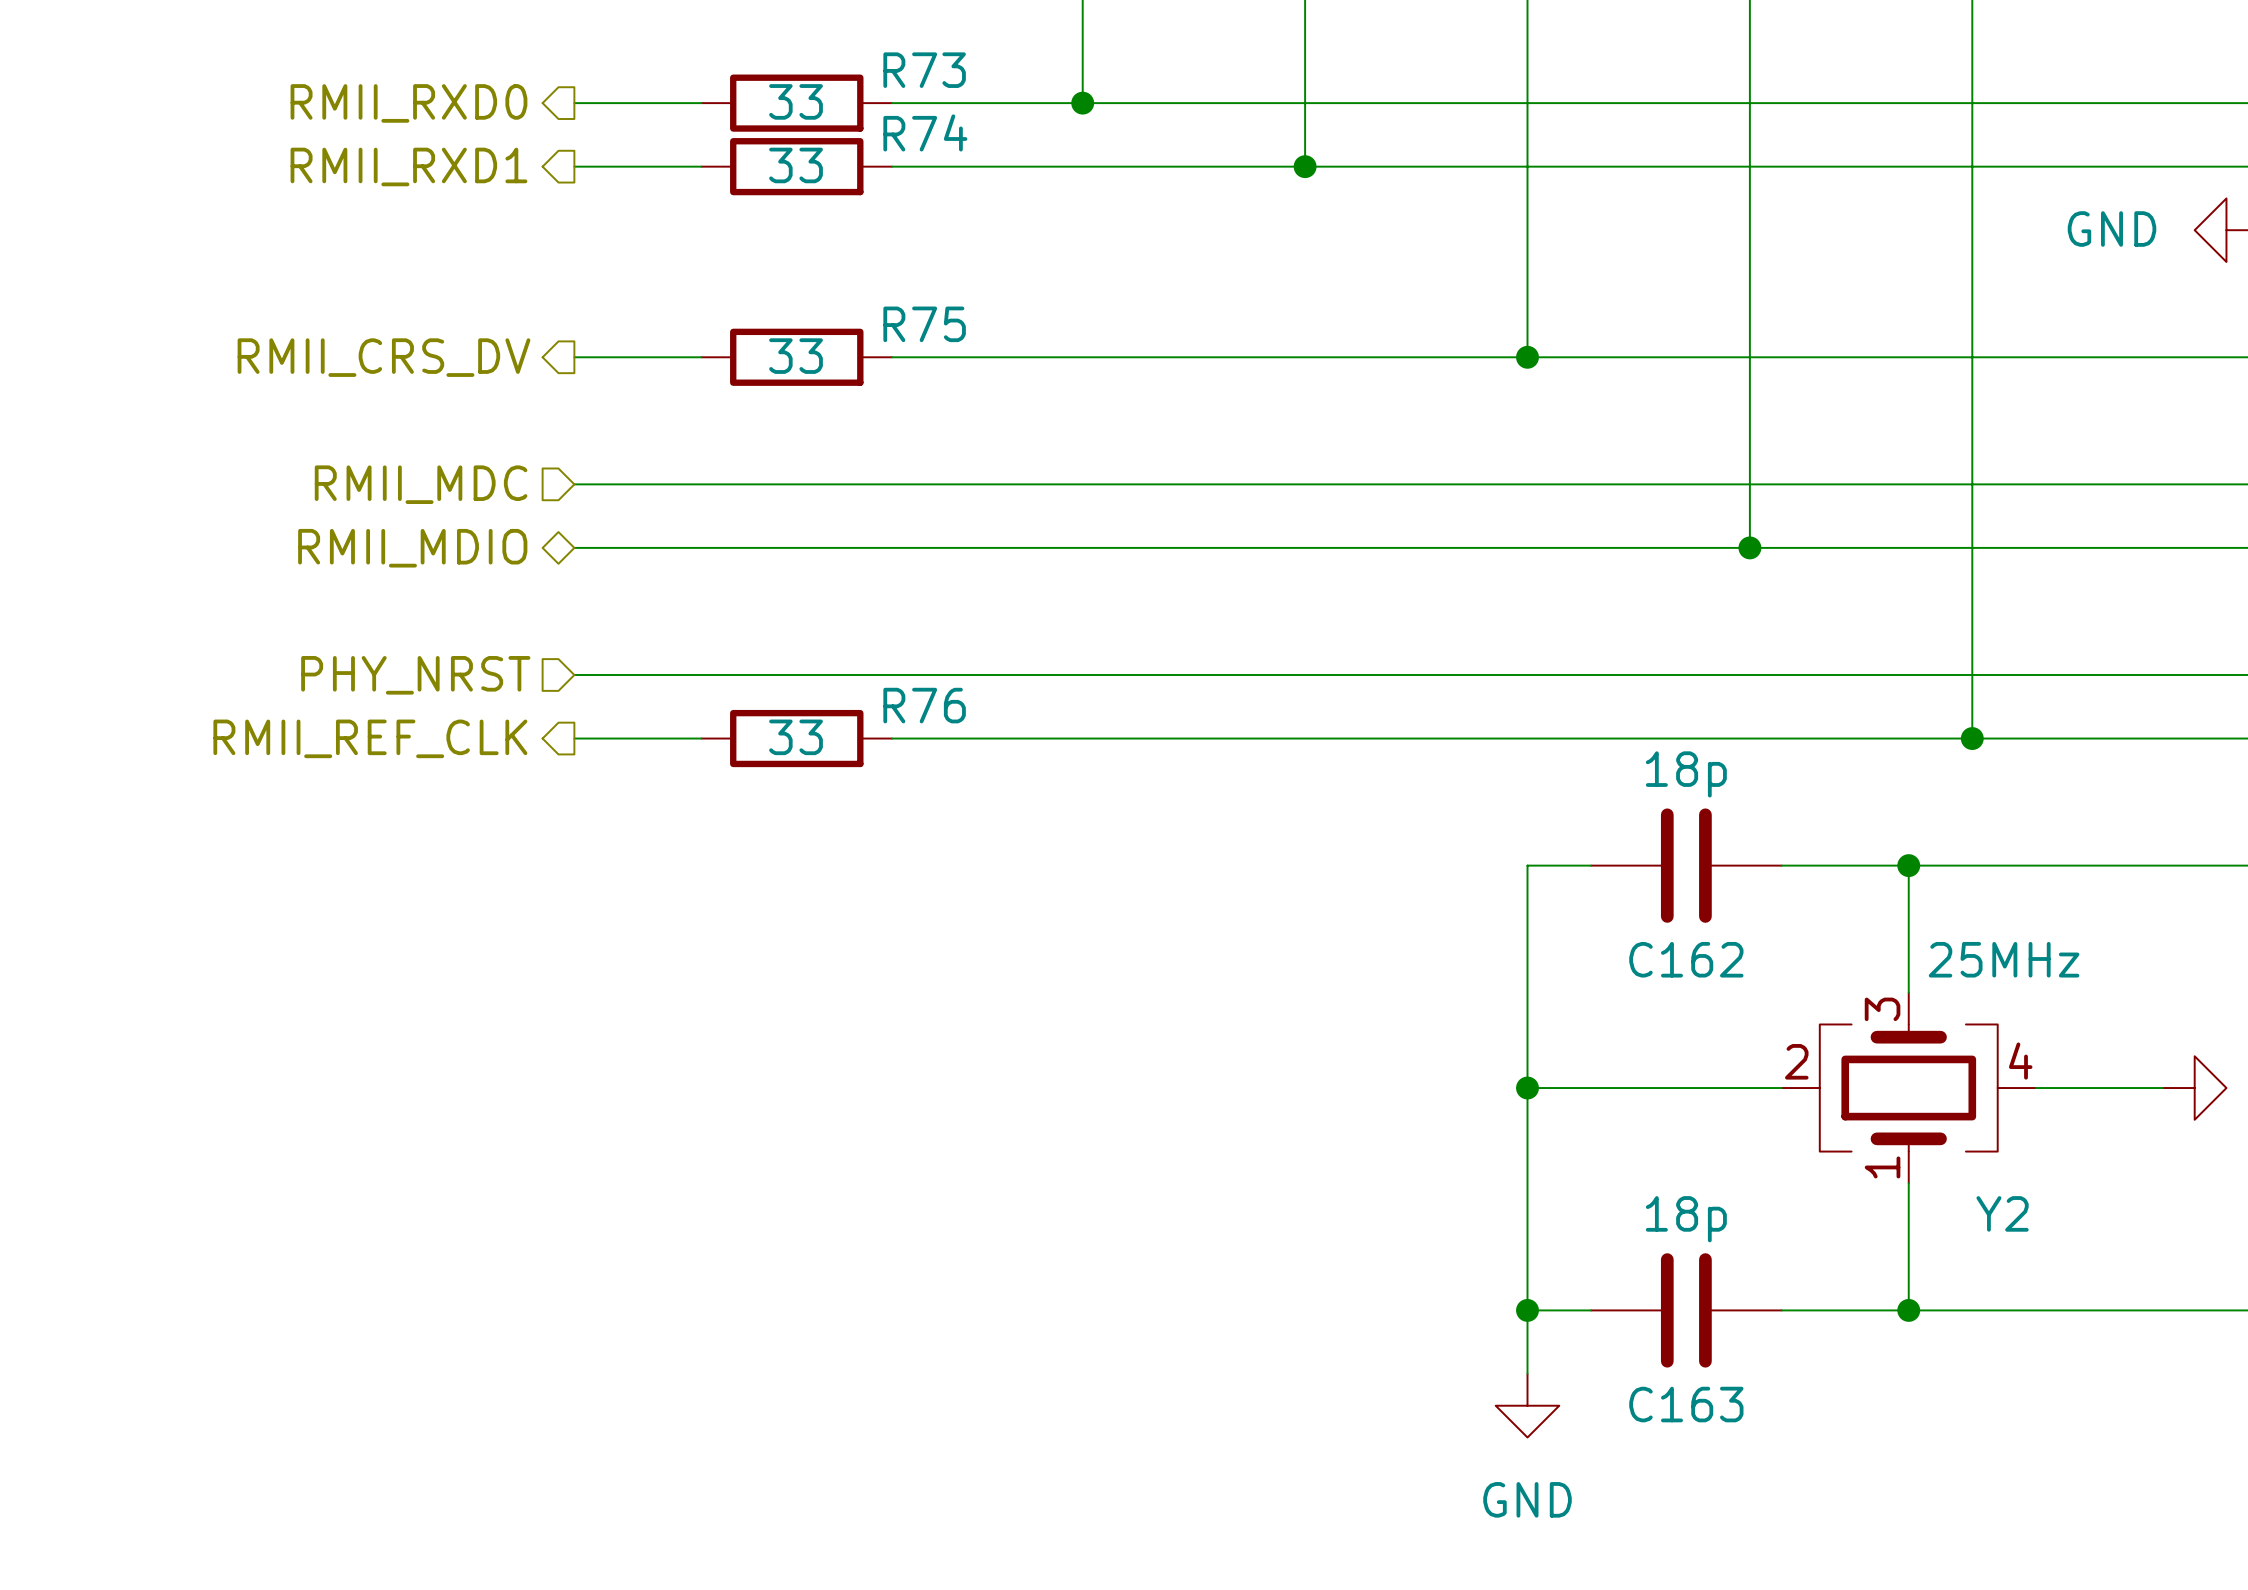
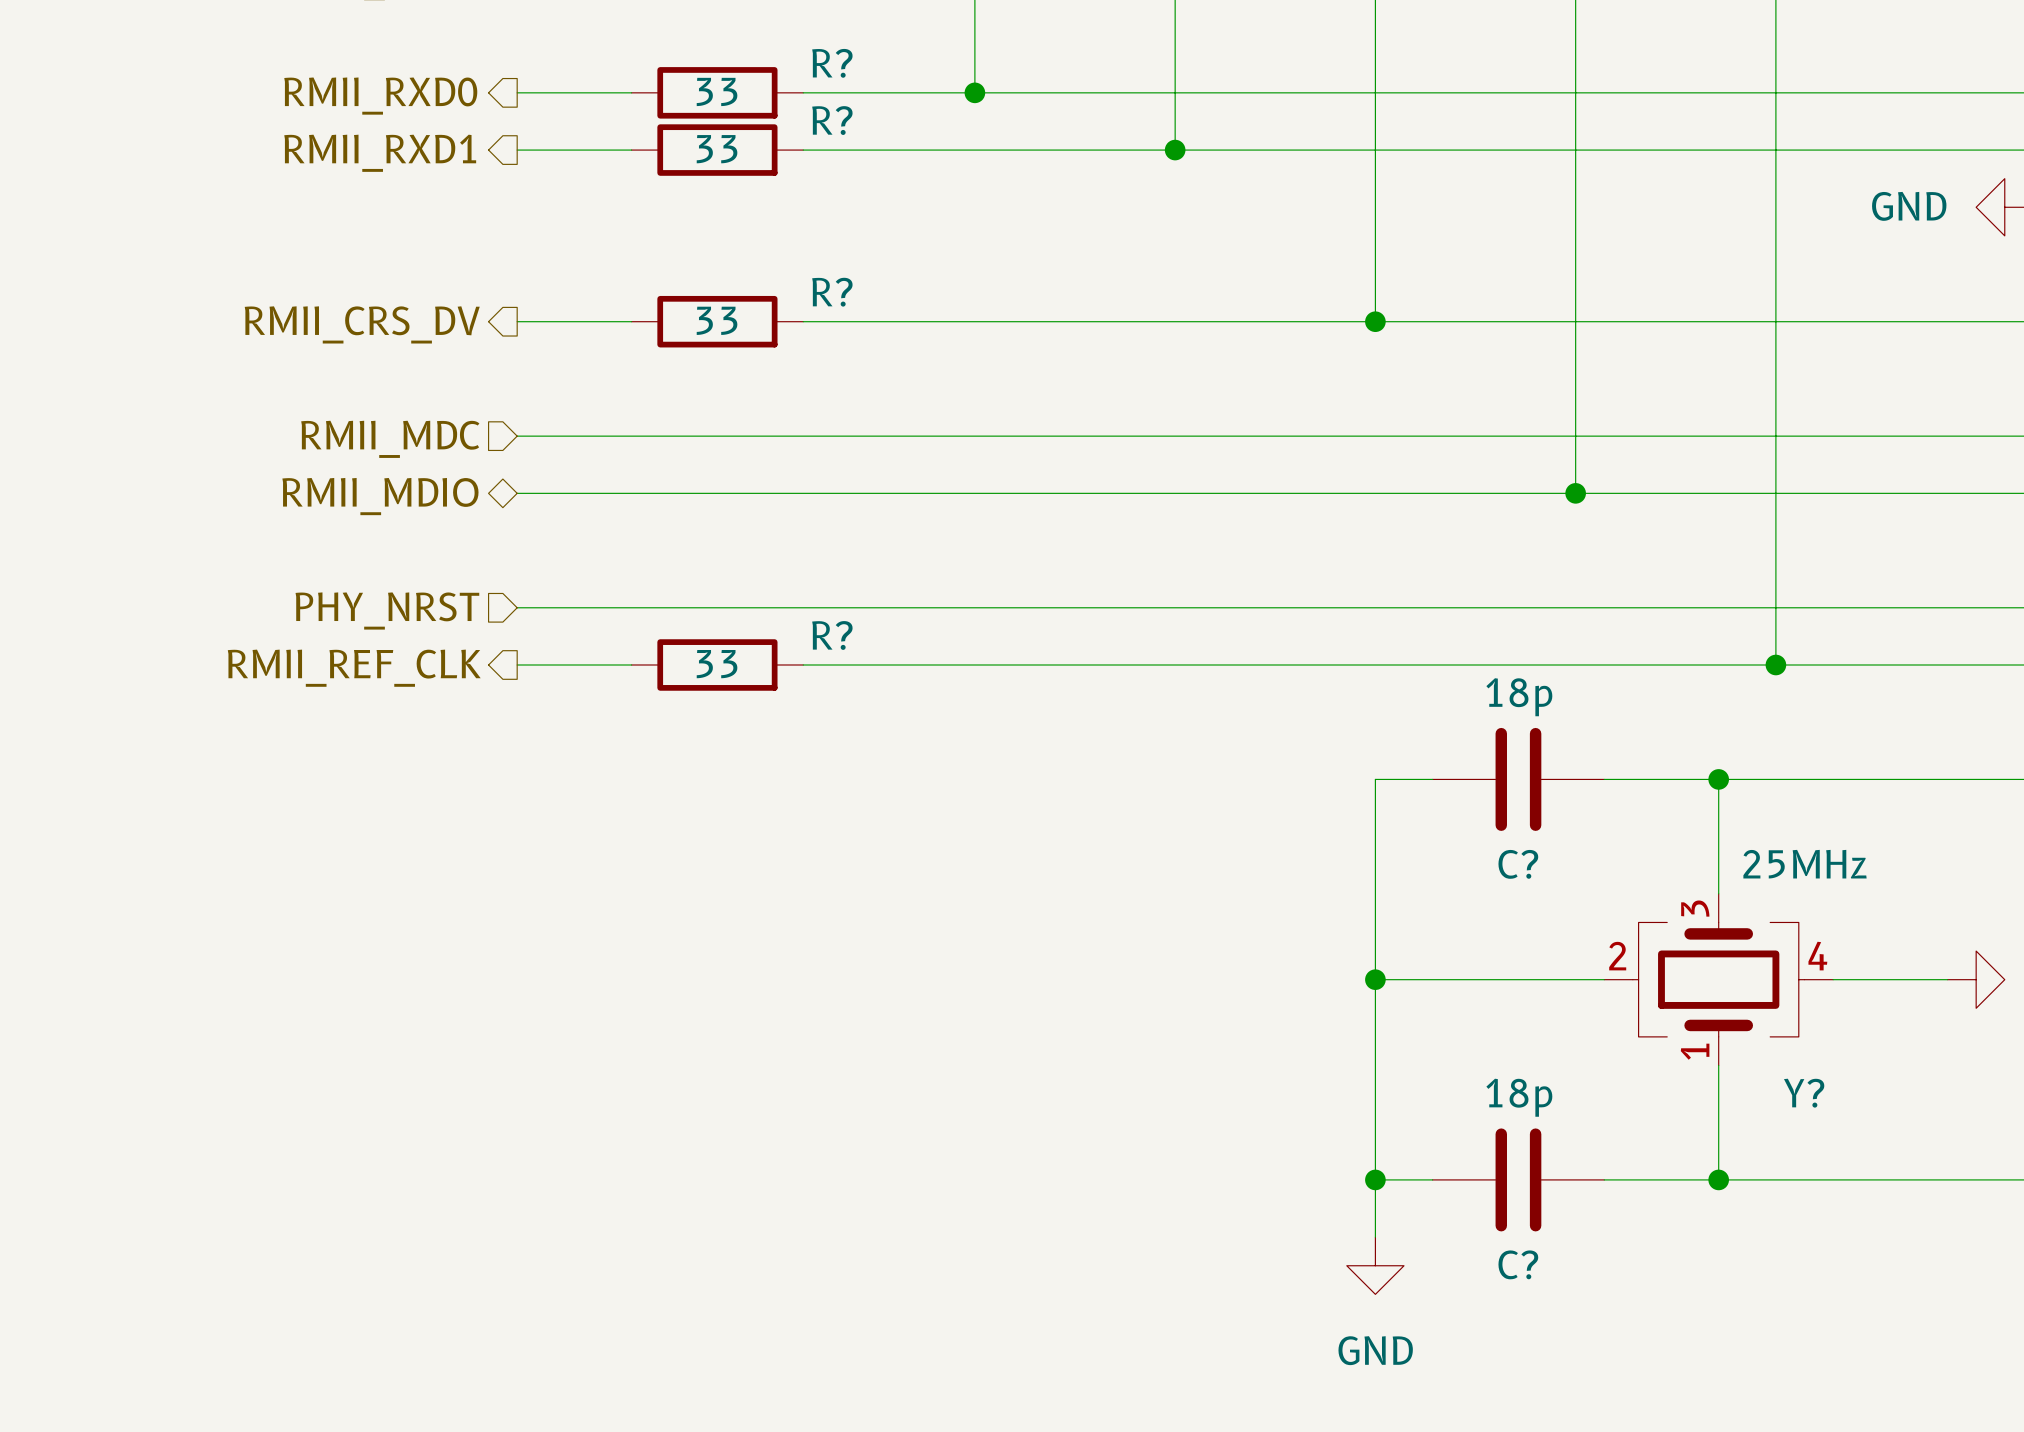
R73 name: R73 (924, 70) -> R? (832, 63)
R74 name: R74 (925, 132) -> R? (832, 120)
R75 name: R75 (924, 324) -> R? (832, 292)
R76 name: R76 (924, 705) -> R? (832, 635)
C162 name: C162 (1686, 959) -> C? (1518, 864)
Y2 name: Y2 (2002, 1213) -> Y? (1804, 1093)
C163 name: C163 (1686, 1404) -> C? (1518, 1264)

